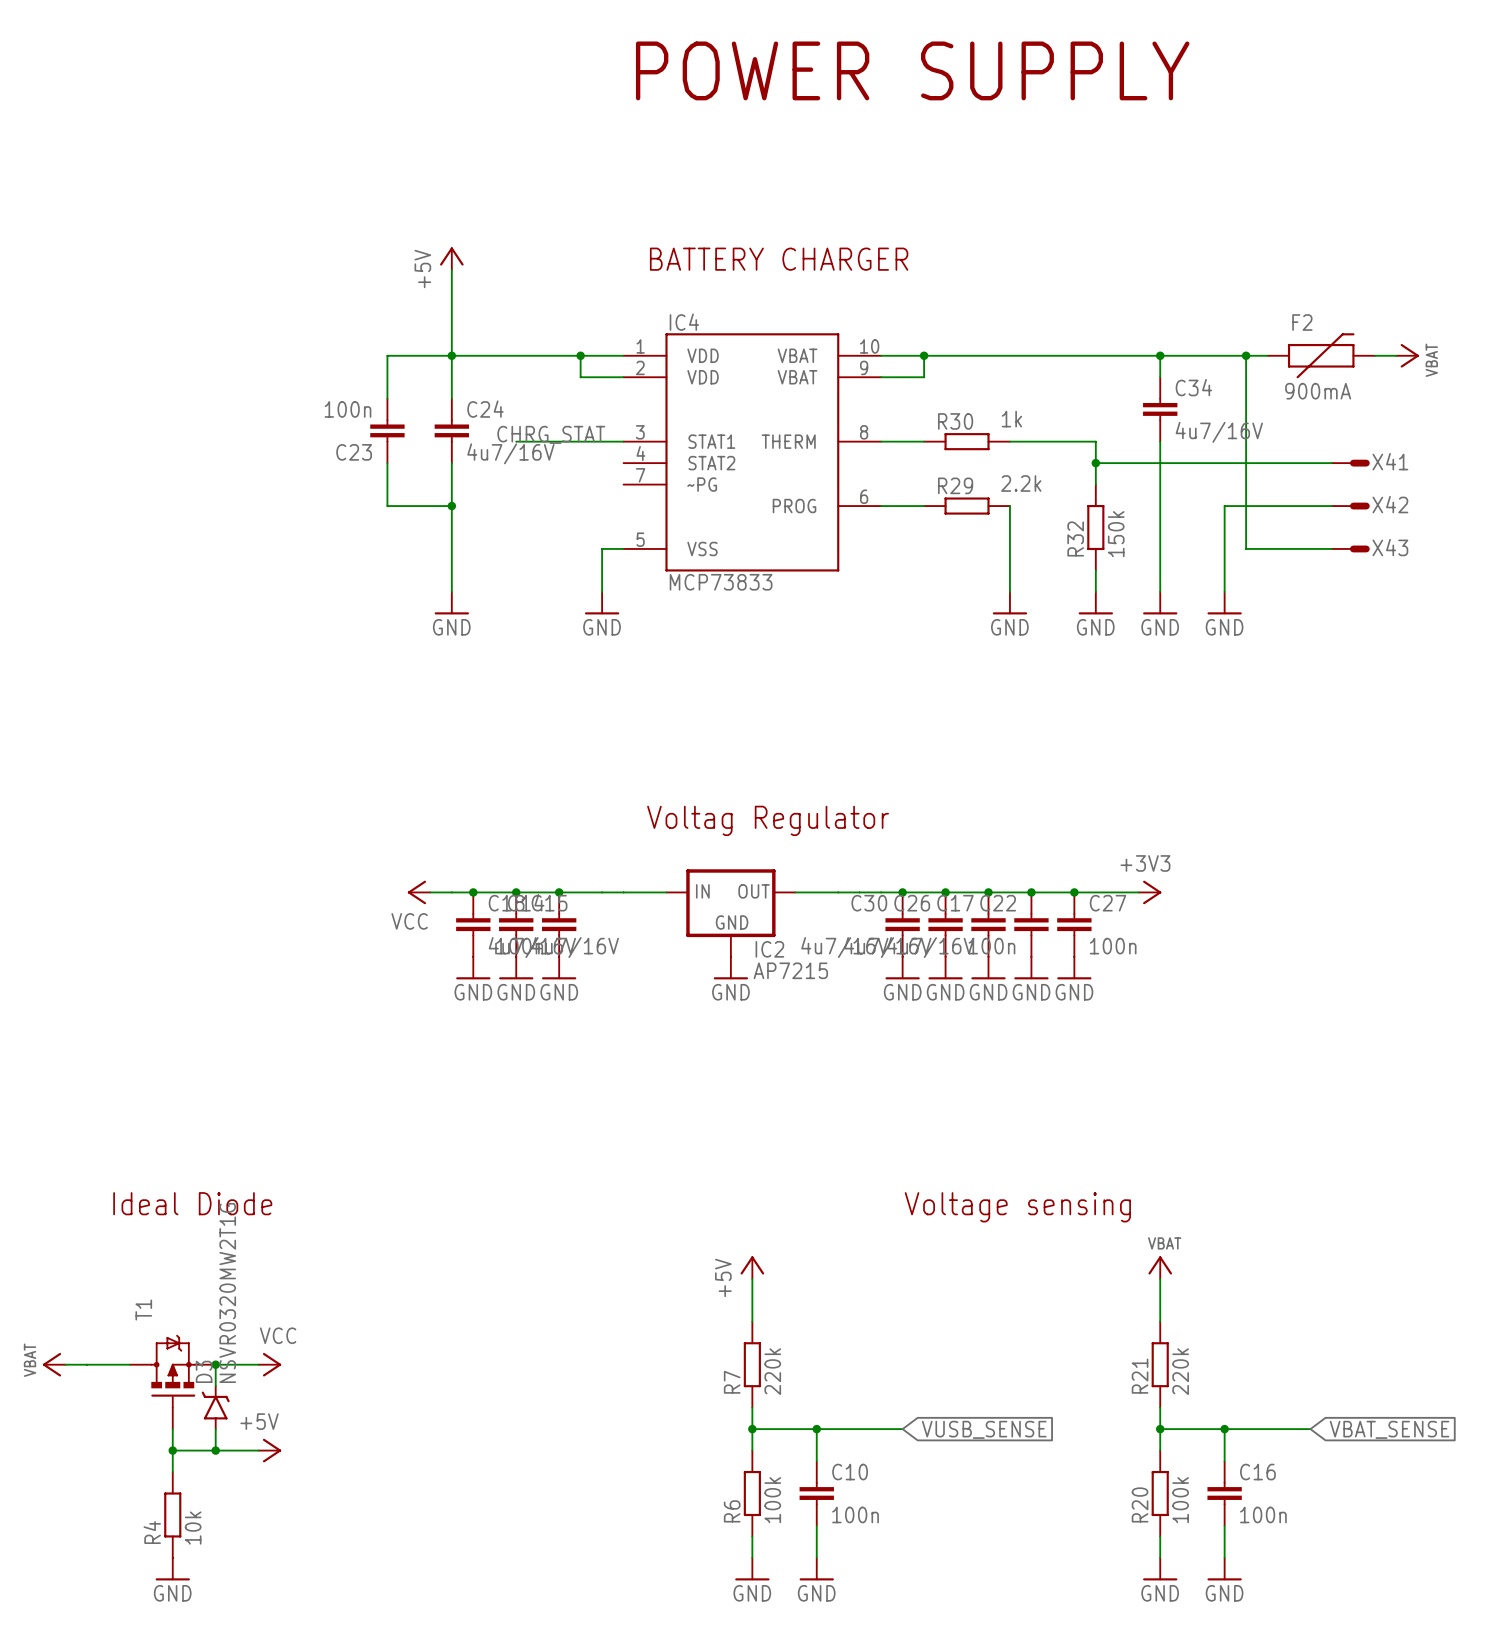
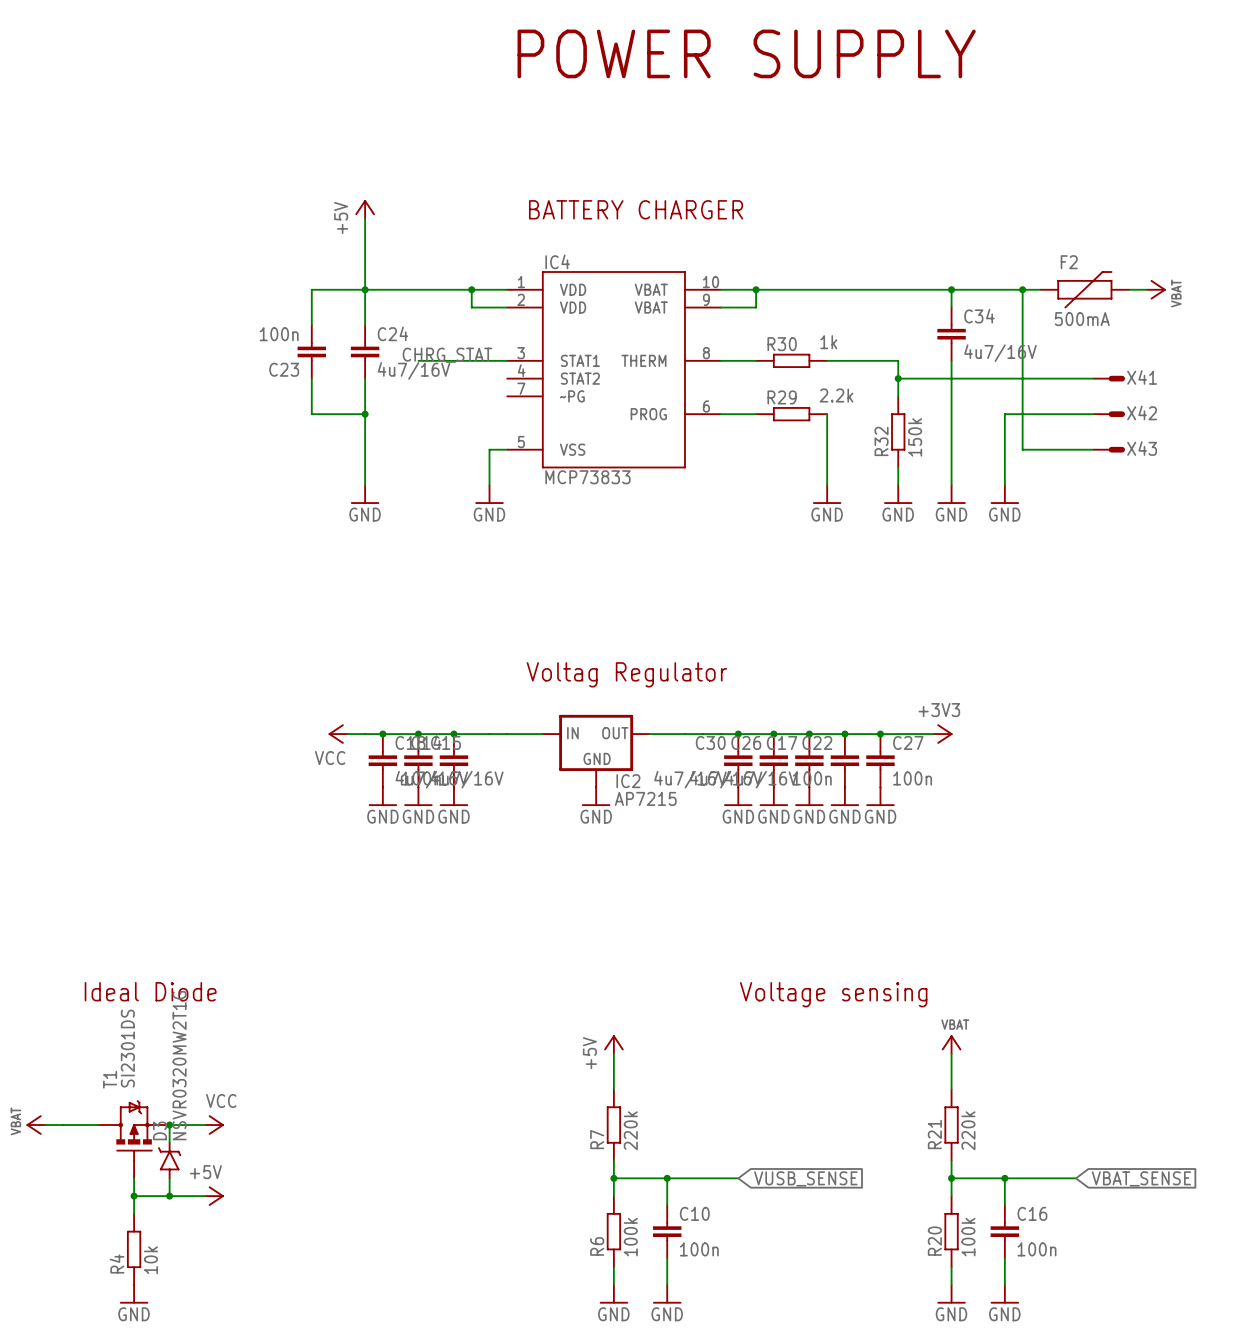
F2 value: 900mA (1318, 391) -> 500mA (1082, 319)
T1 value: none -> SI2301DS (127, 1048)

